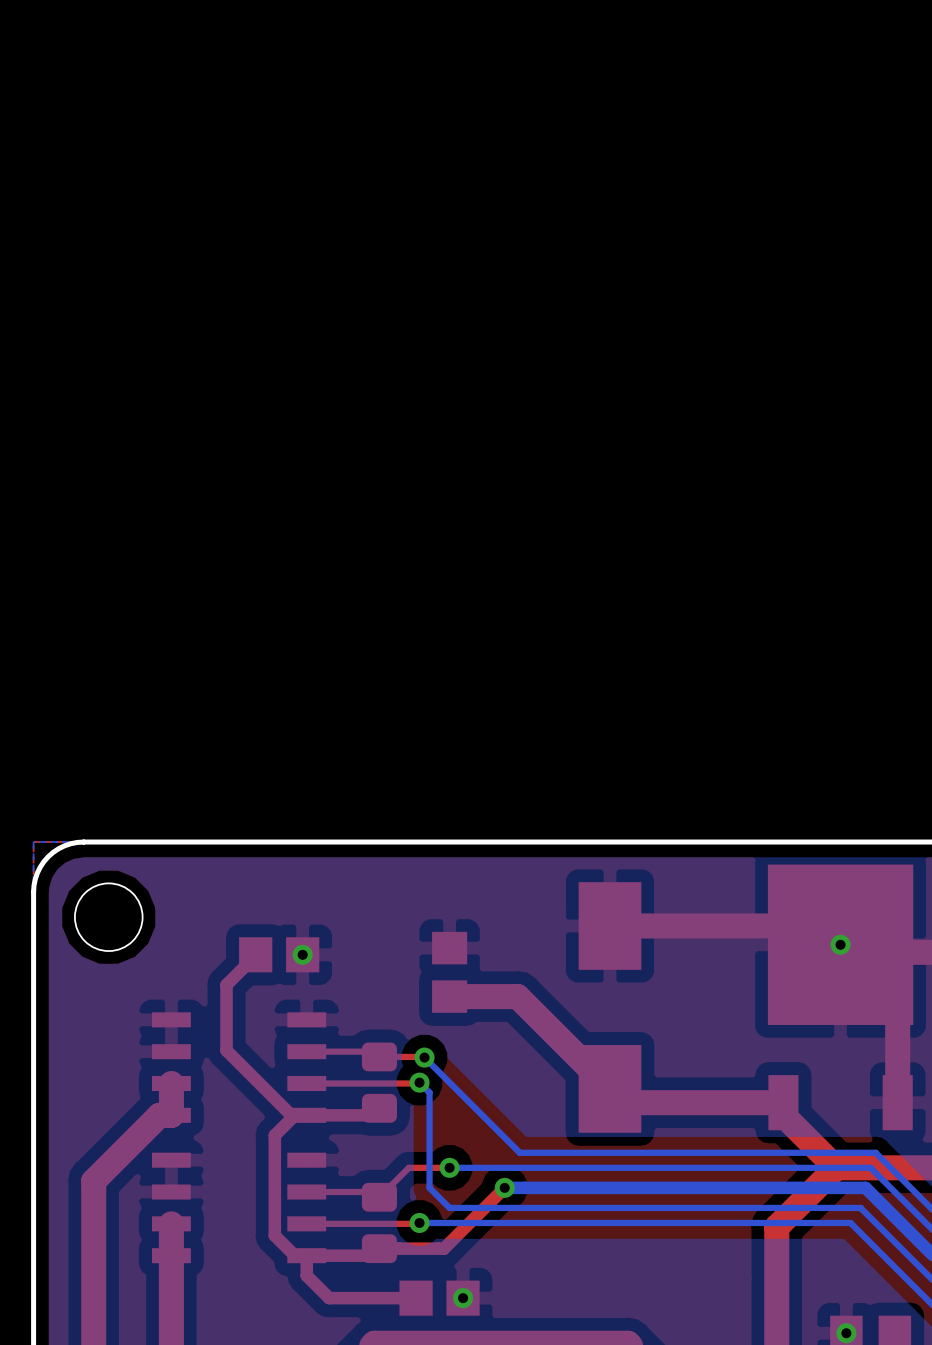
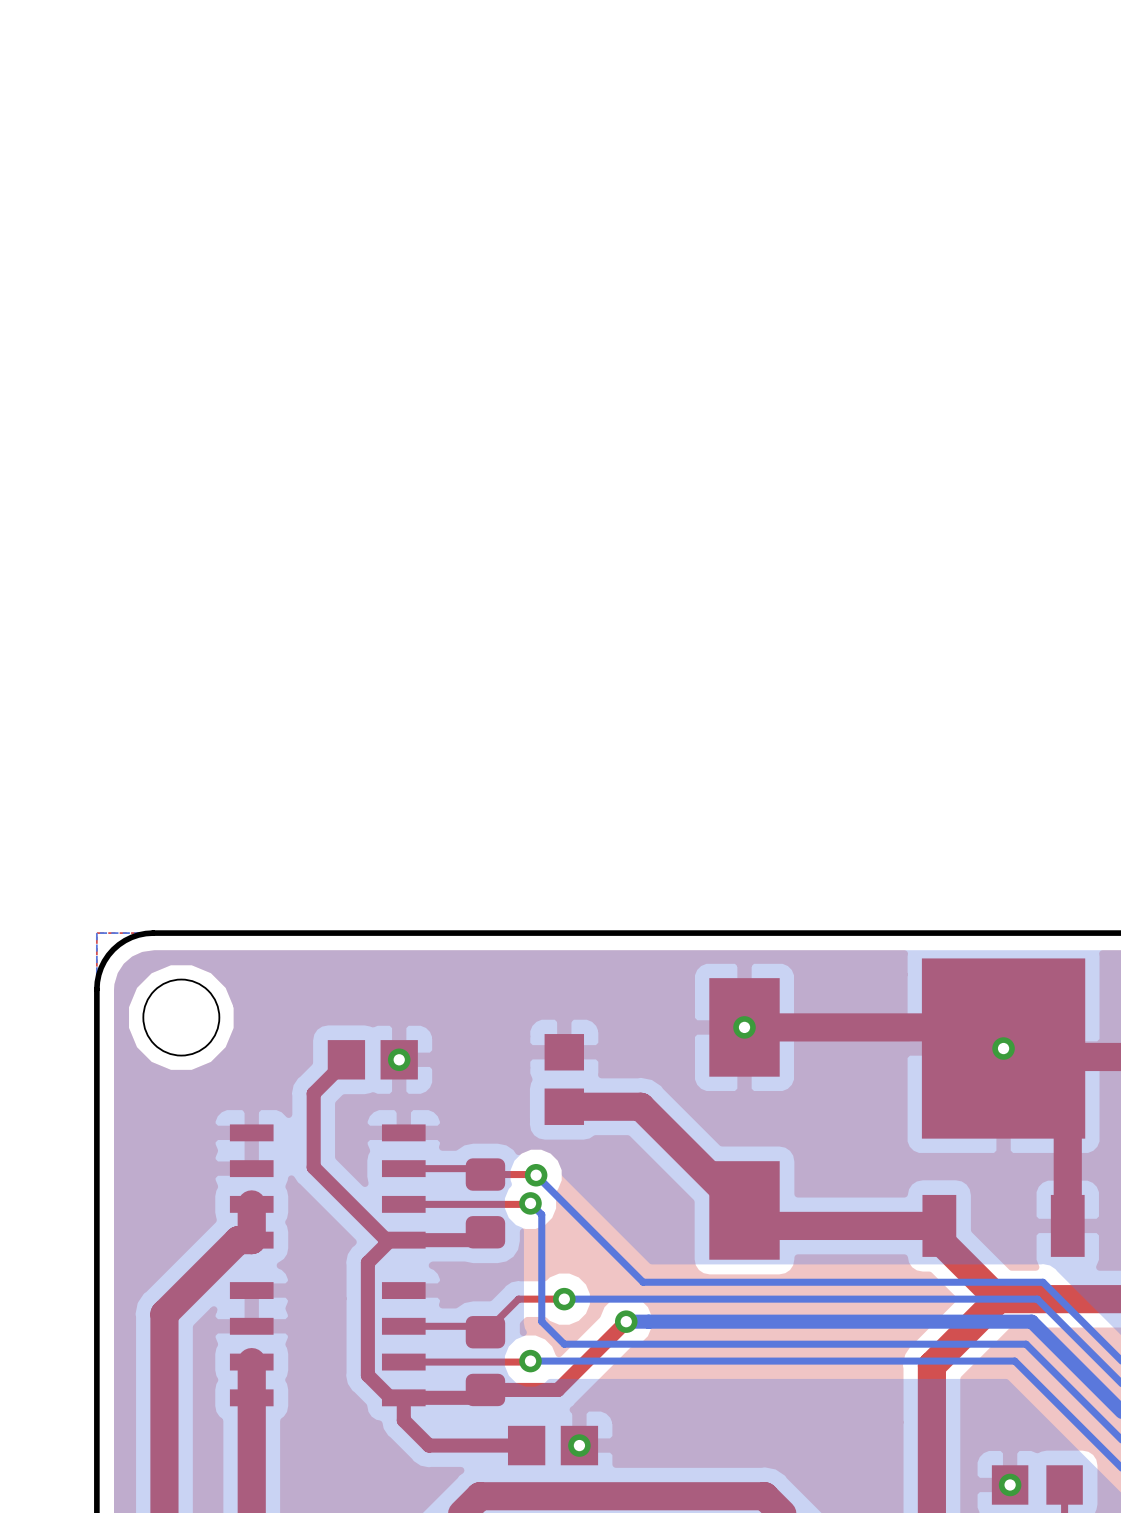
via: none -> (744, 1027)

